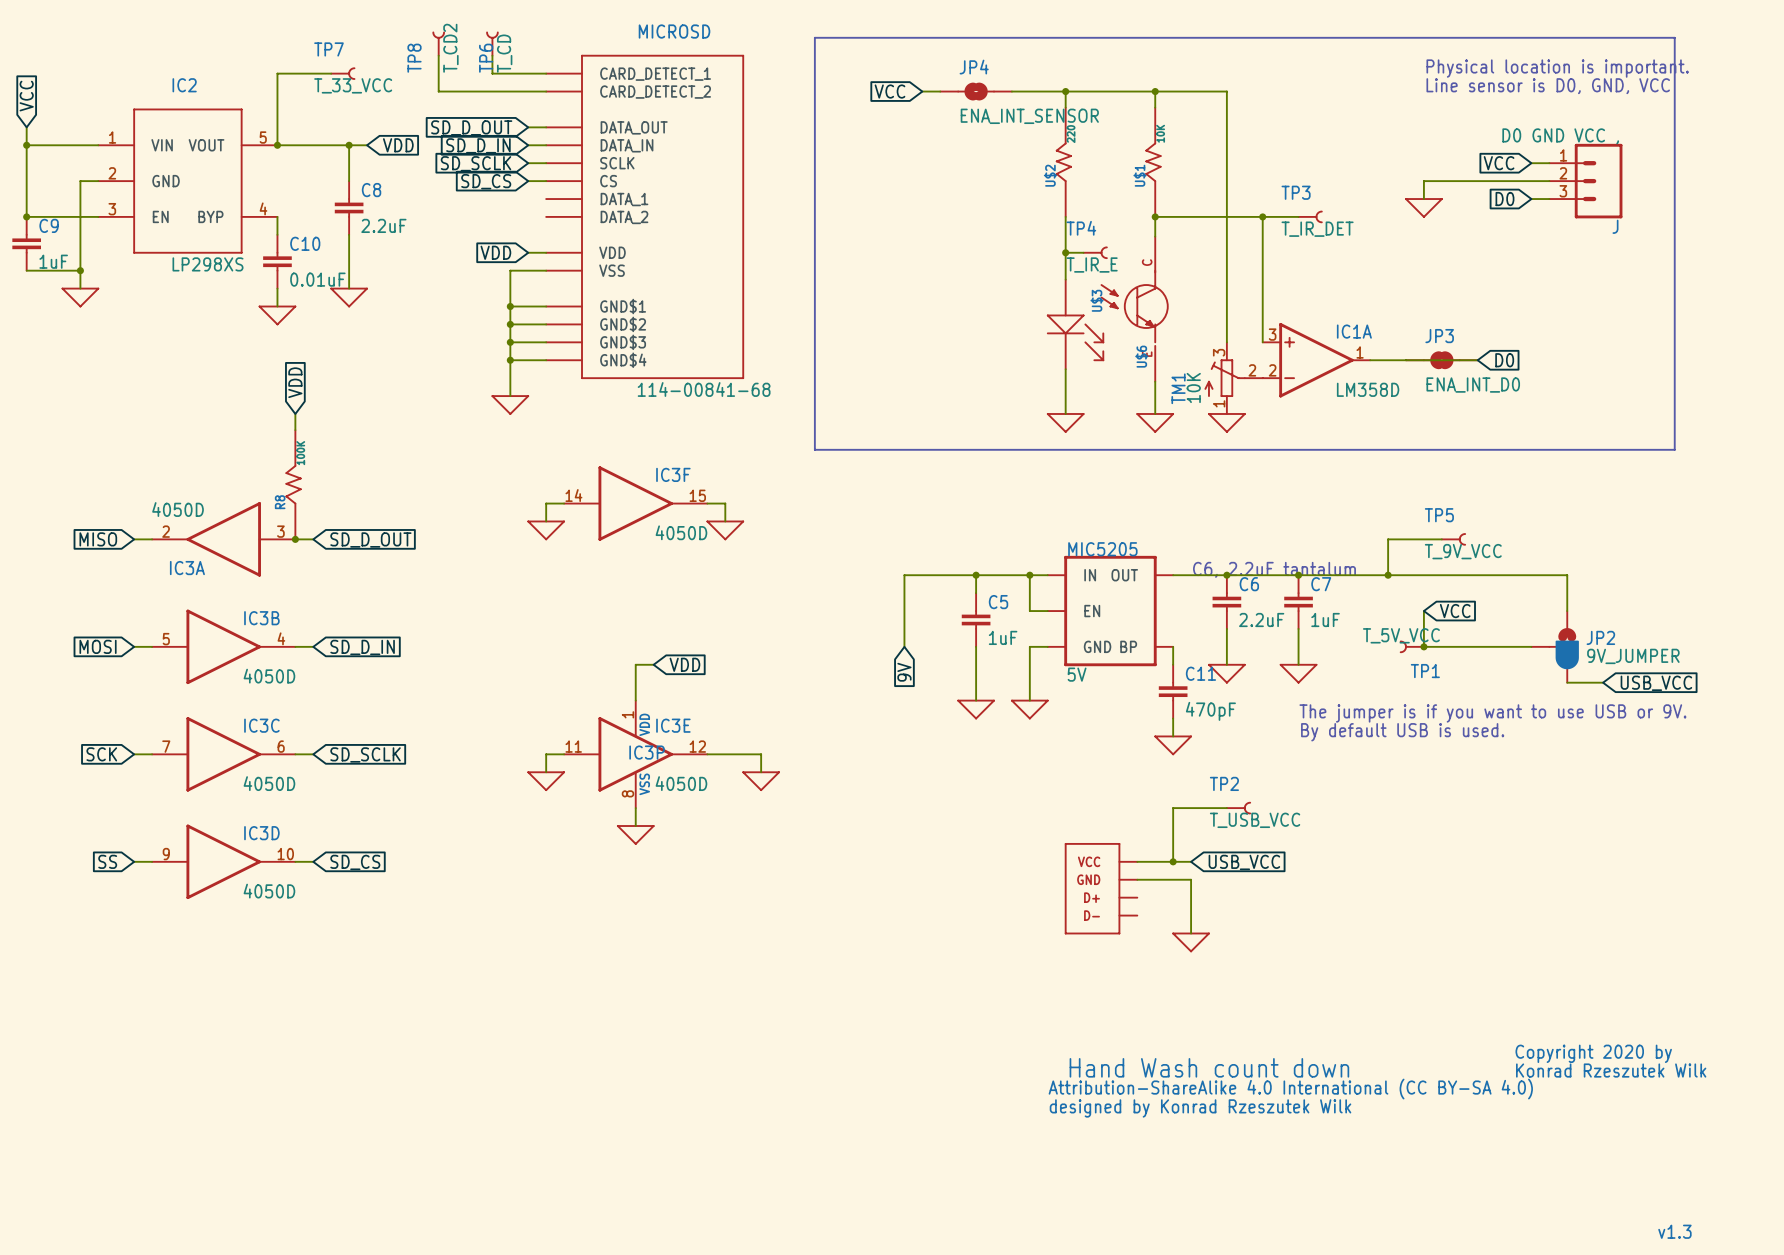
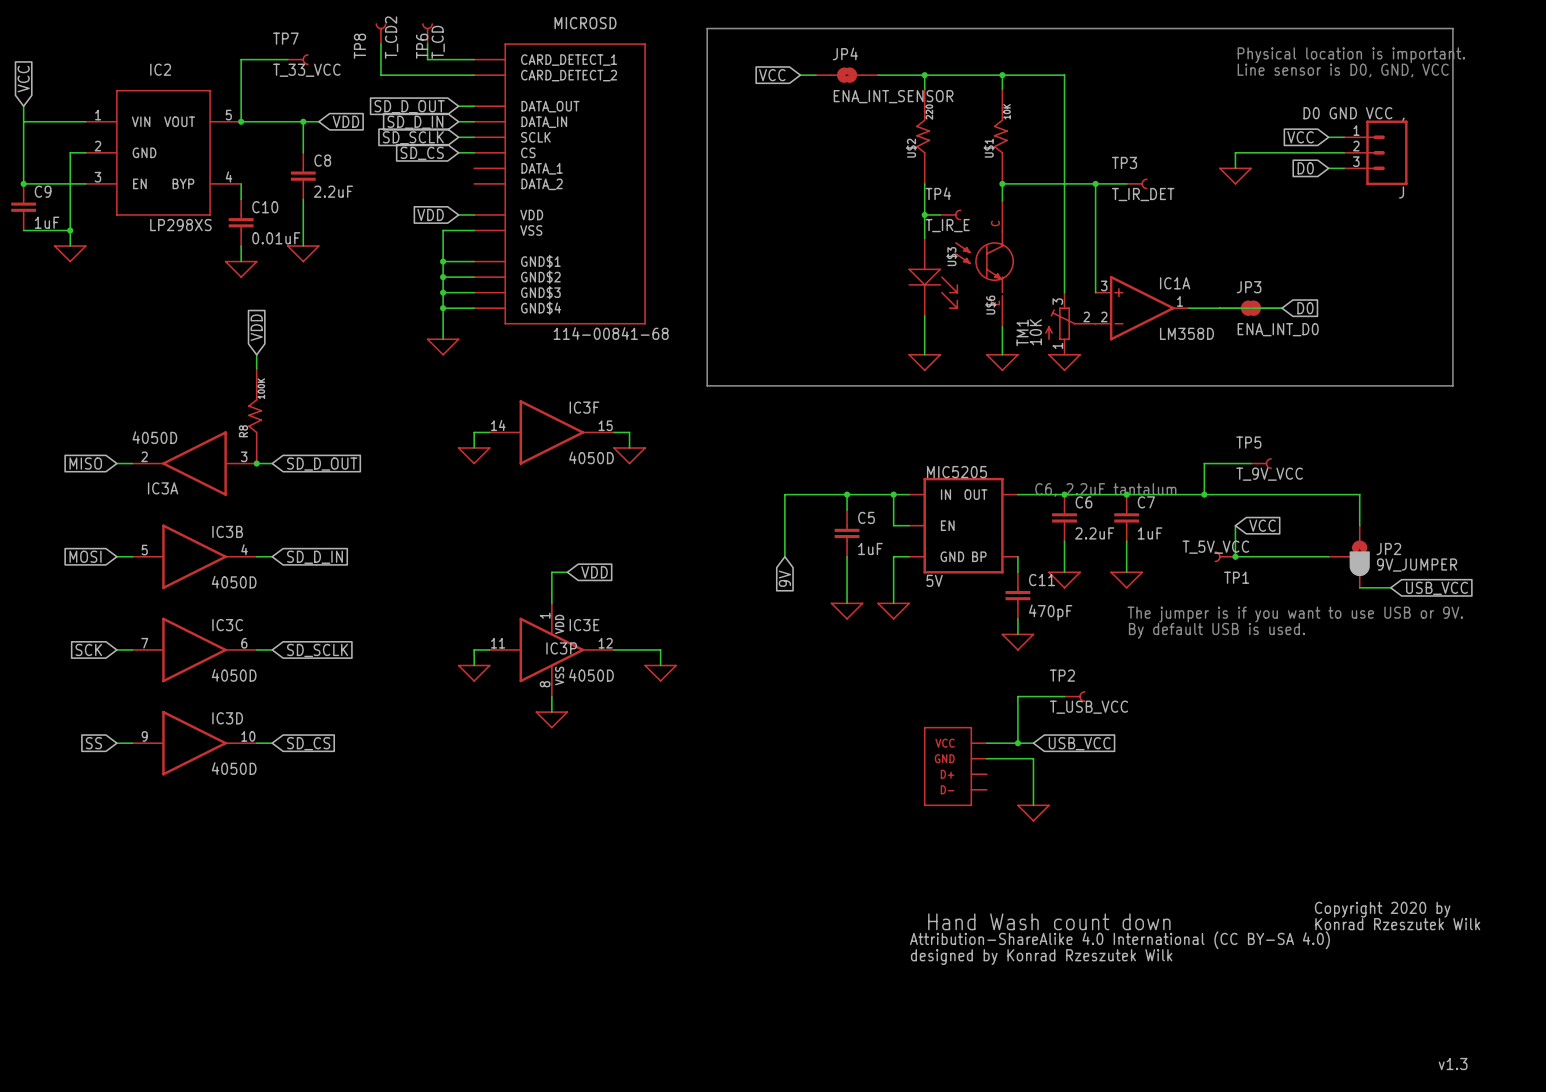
junction: (26, 145) -> none

